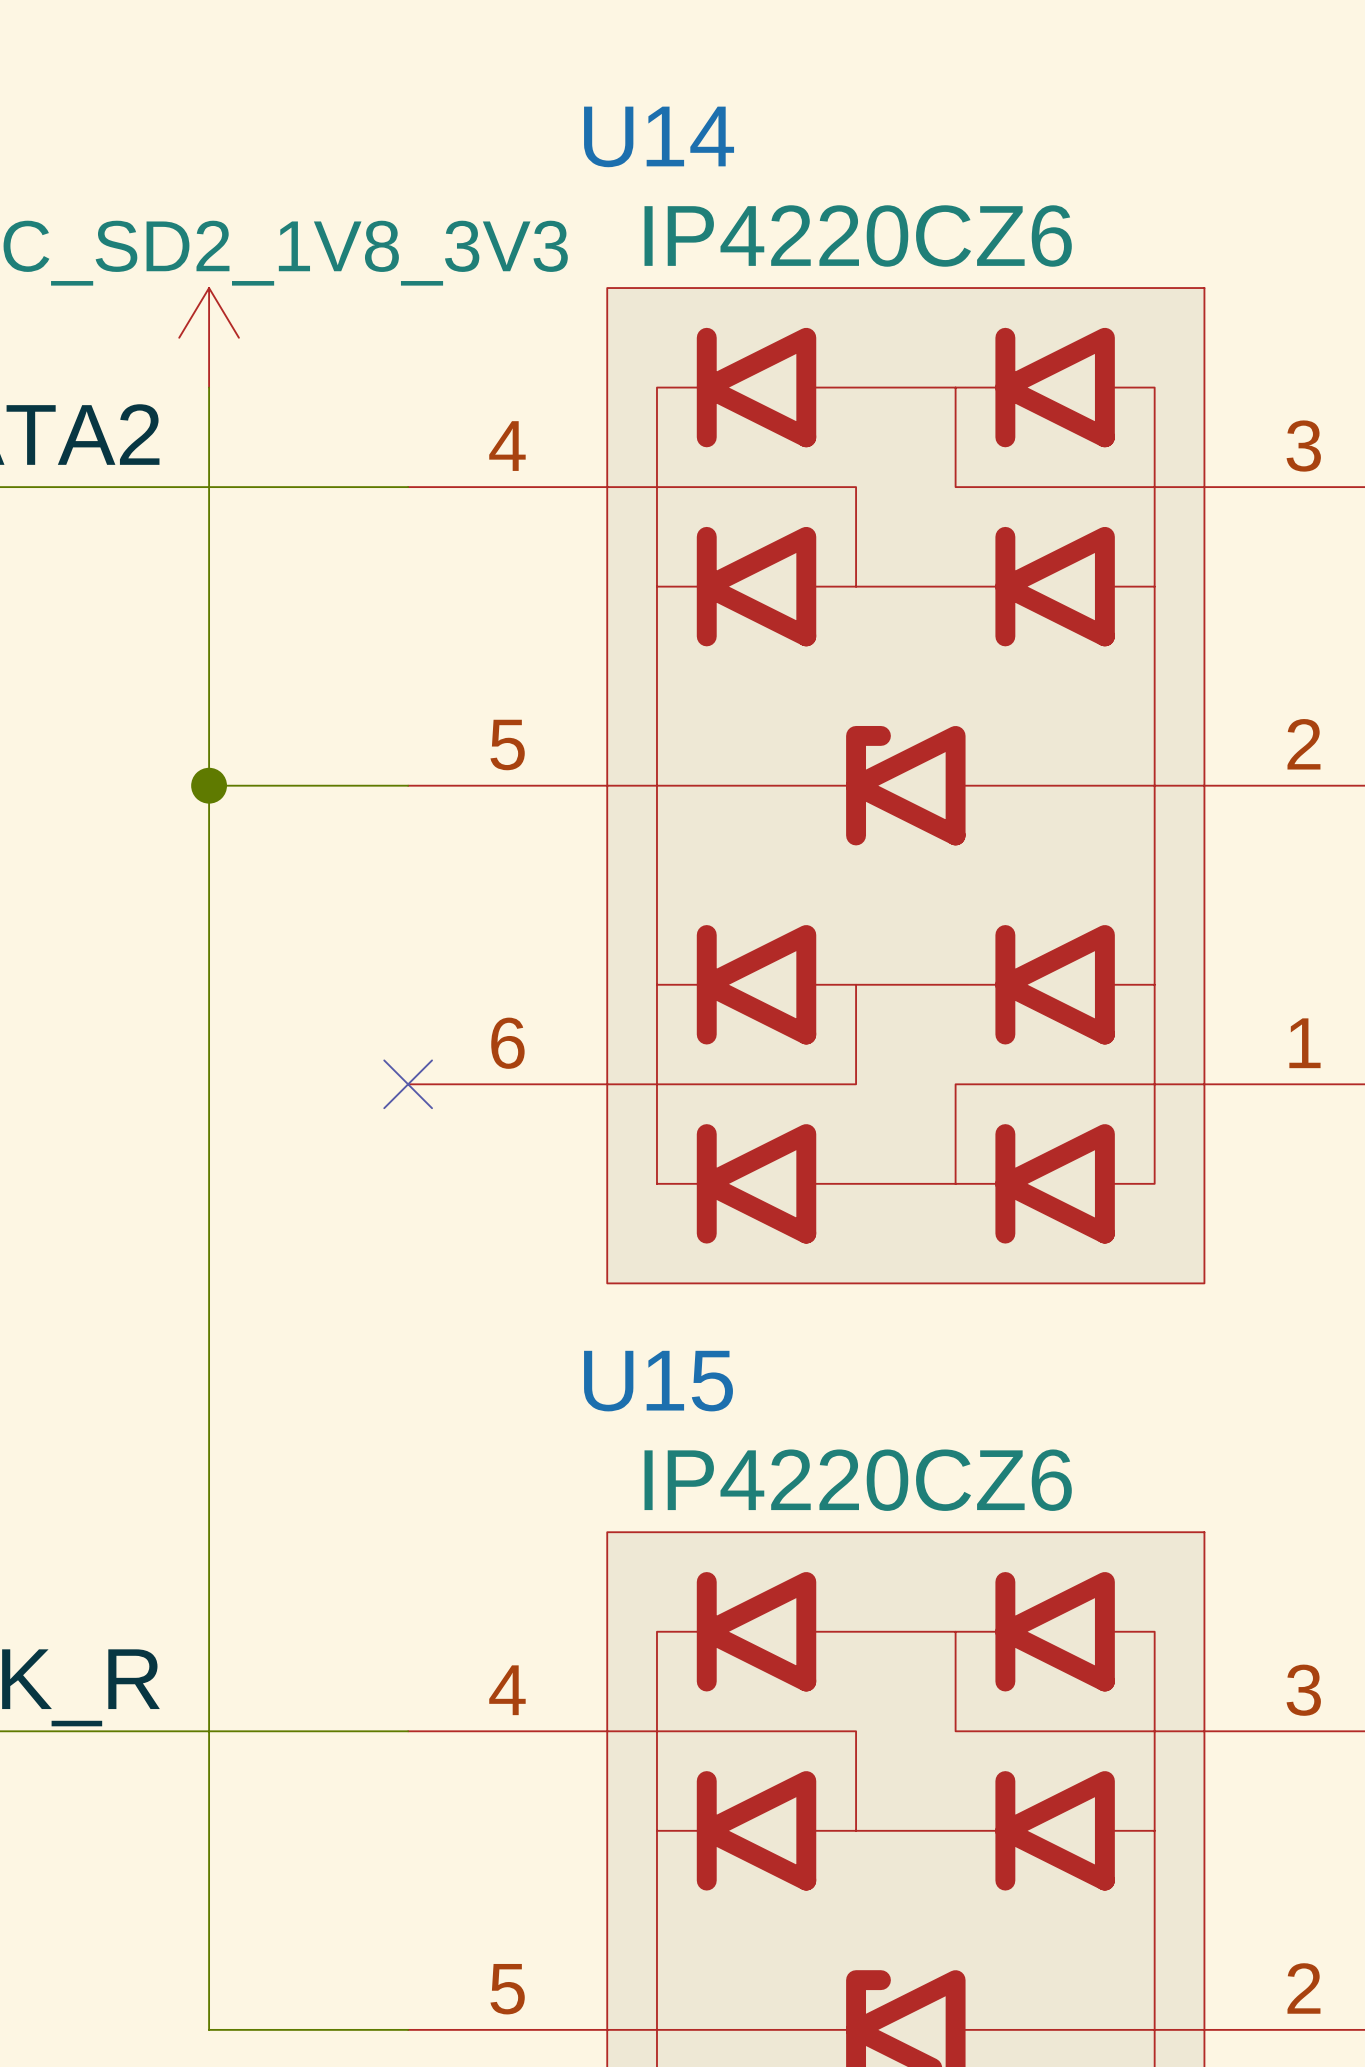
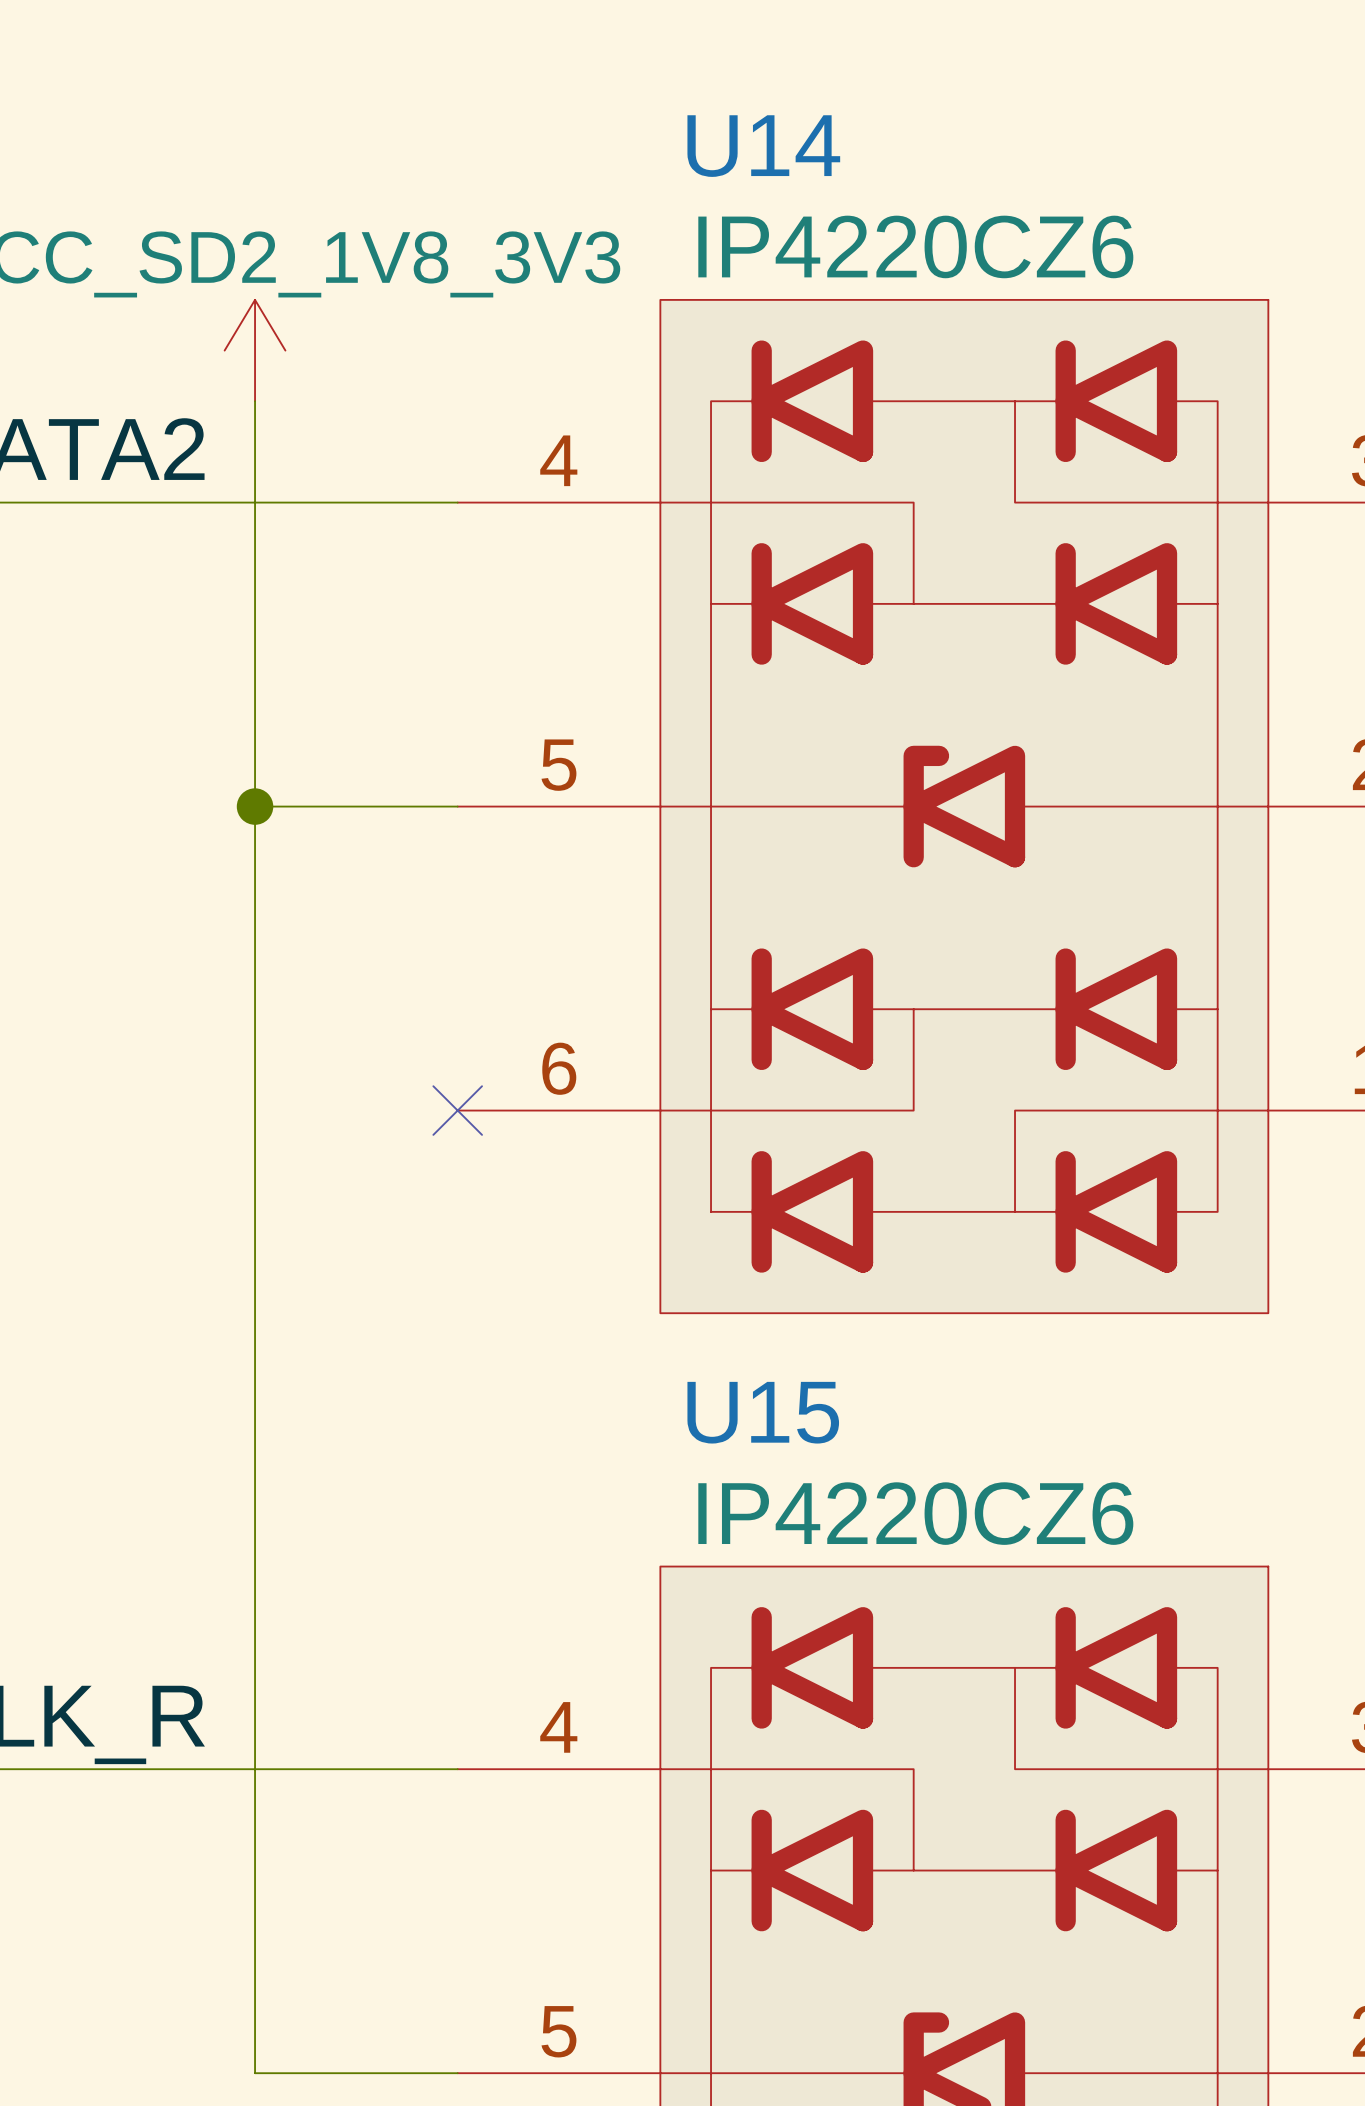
U14 name position: U14 (659, 136) -> U14 (763, 146)
U15 name position: U15 (658, 1381) -> U15 (763, 1412)

